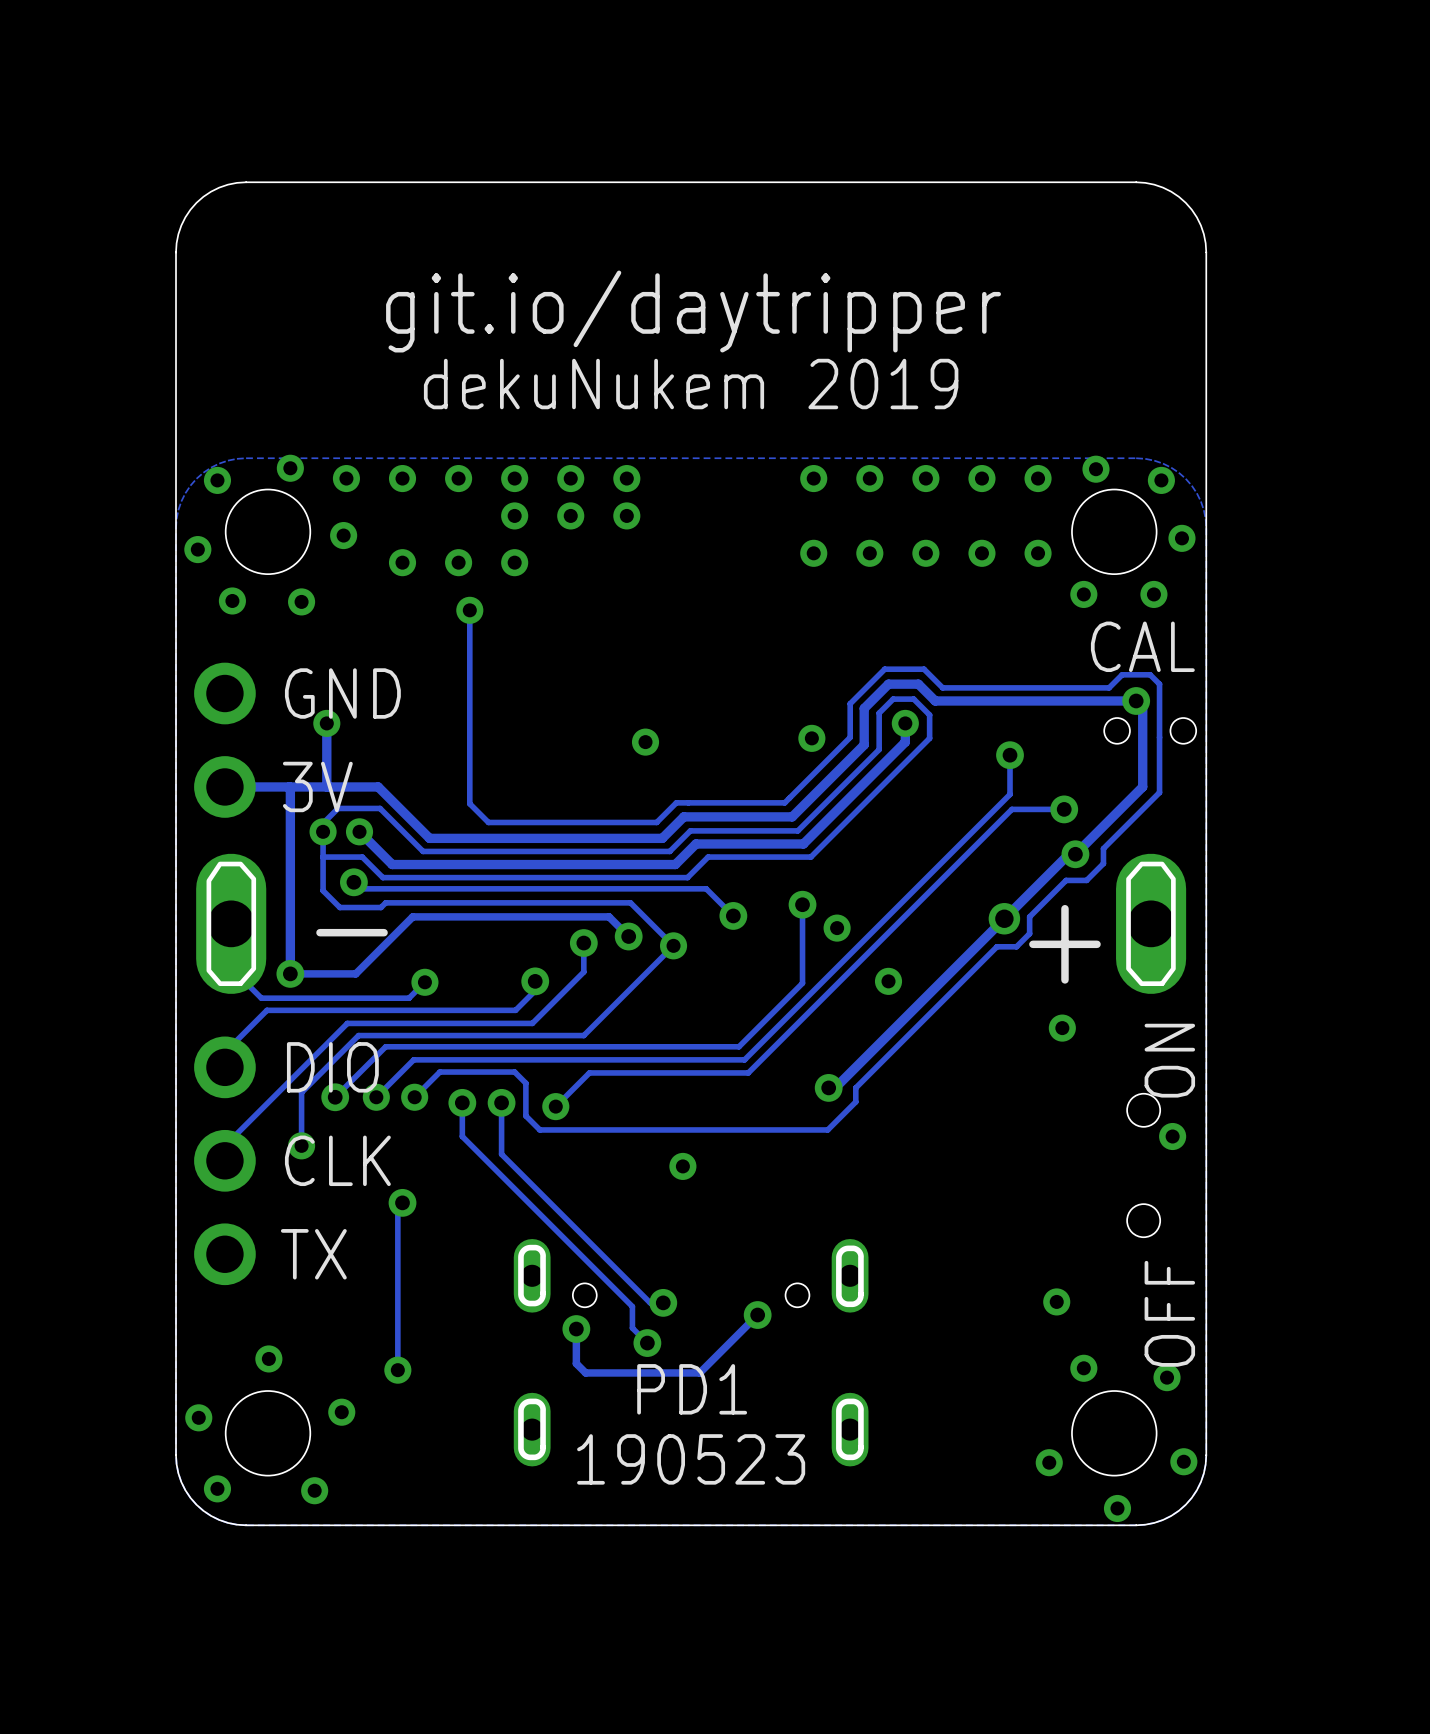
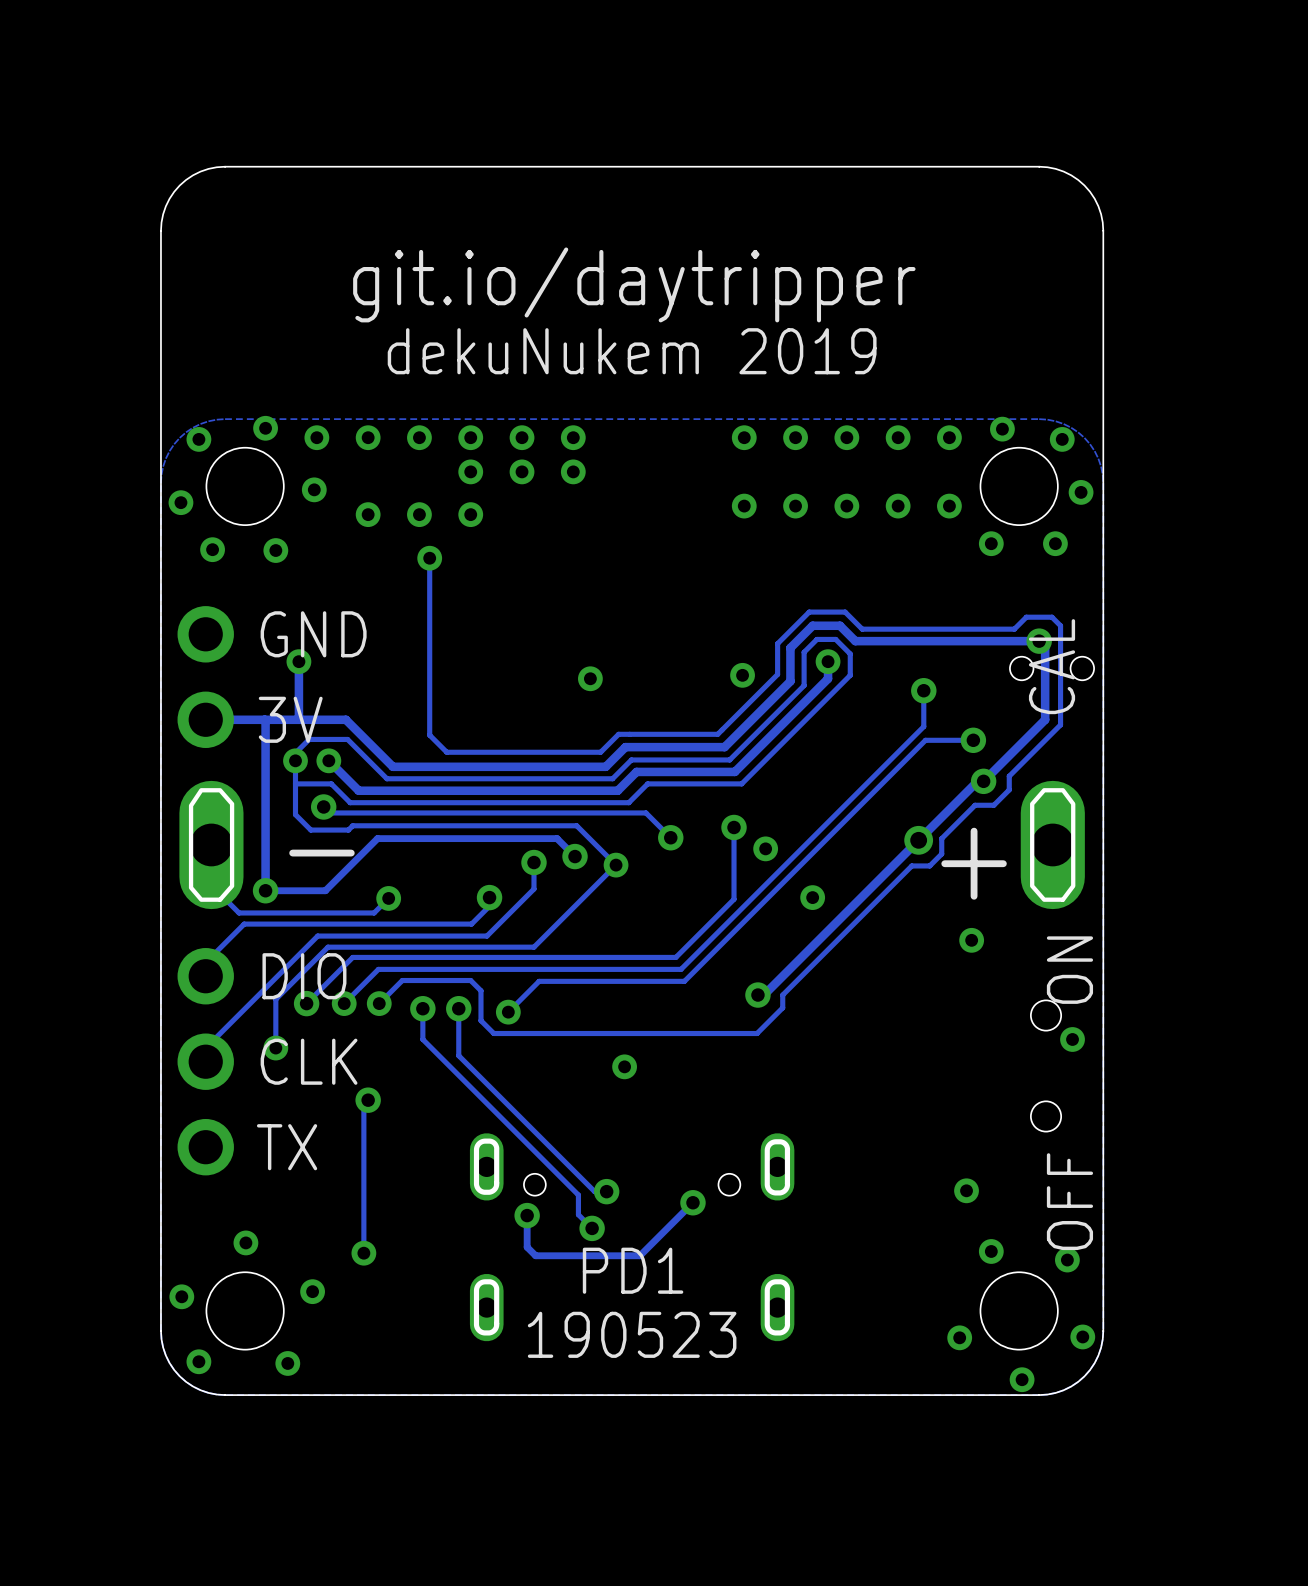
text rotation: 0° (1142, 646) -> 90° counterclockwise (1052, 666)

